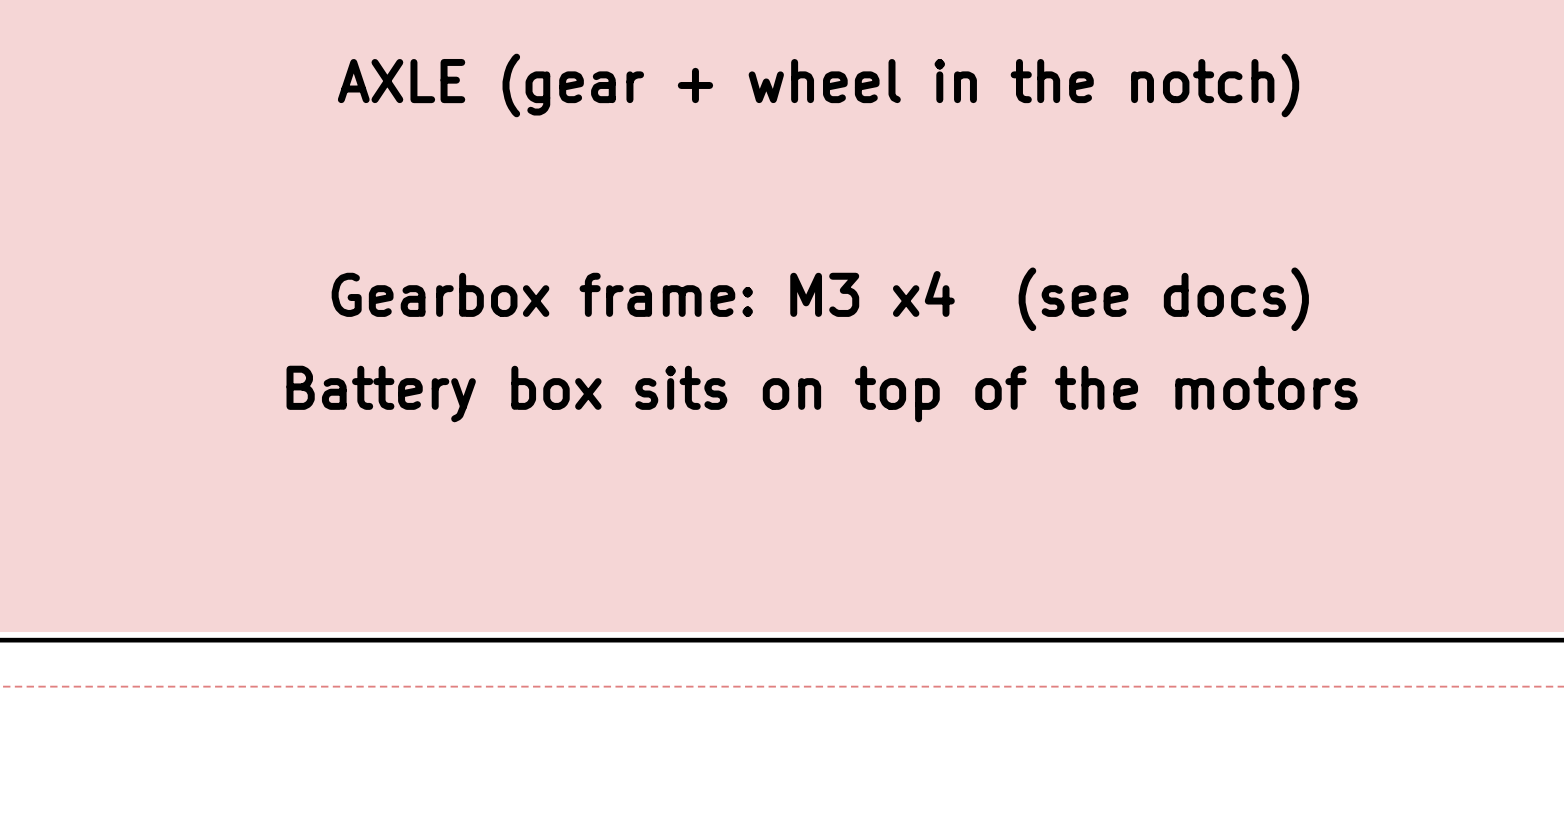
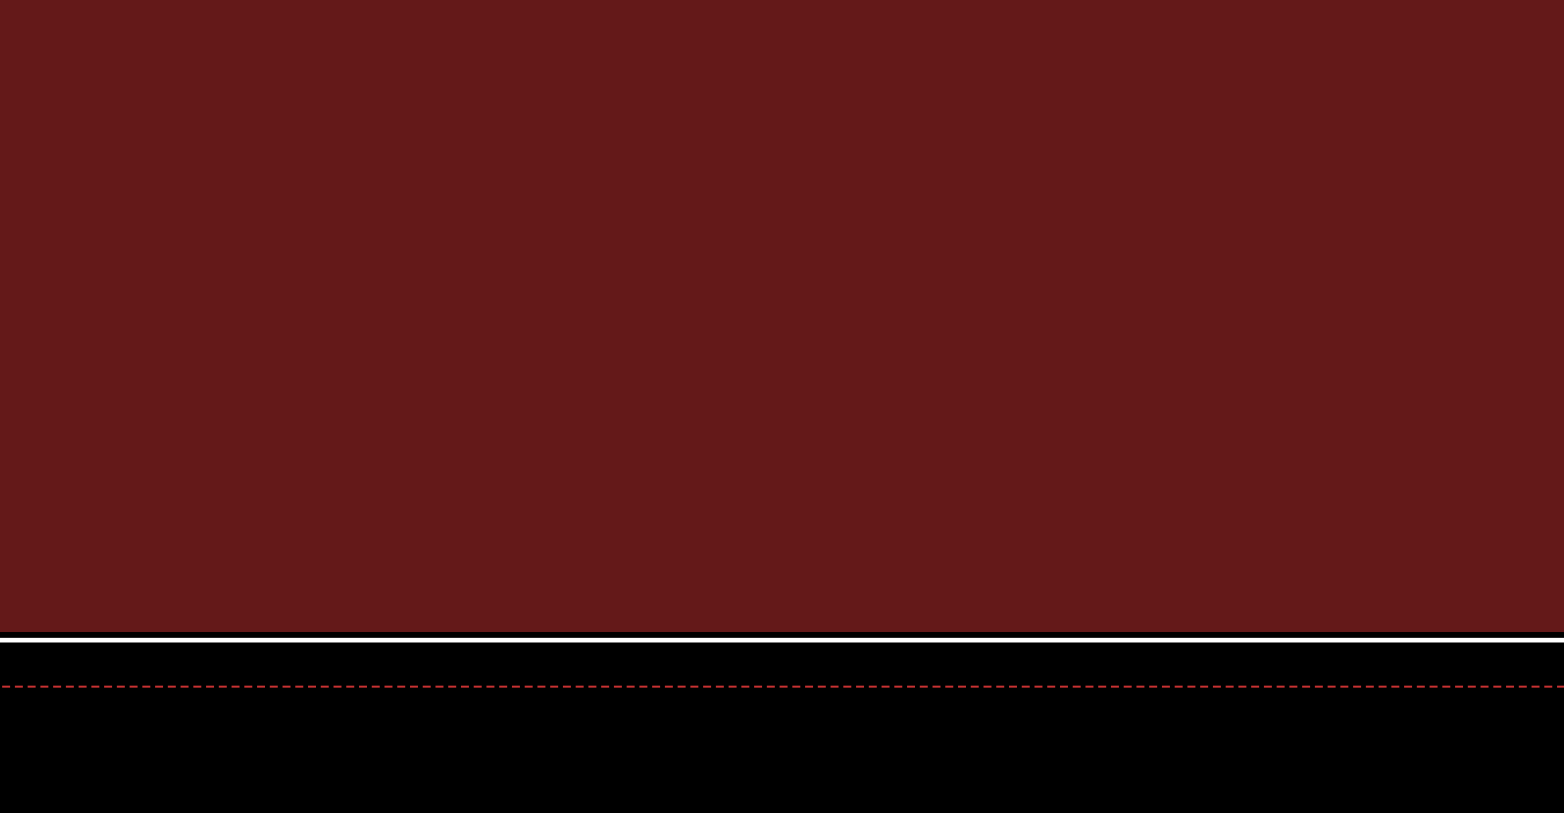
text: AXLE (gear + wheel in the notch) (818, 85) -> none
text: Gearbox frame: M3 x4 (see docs) (820, 299) -> none
text: Battery box sits on top of the motors (822, 394) -> none

